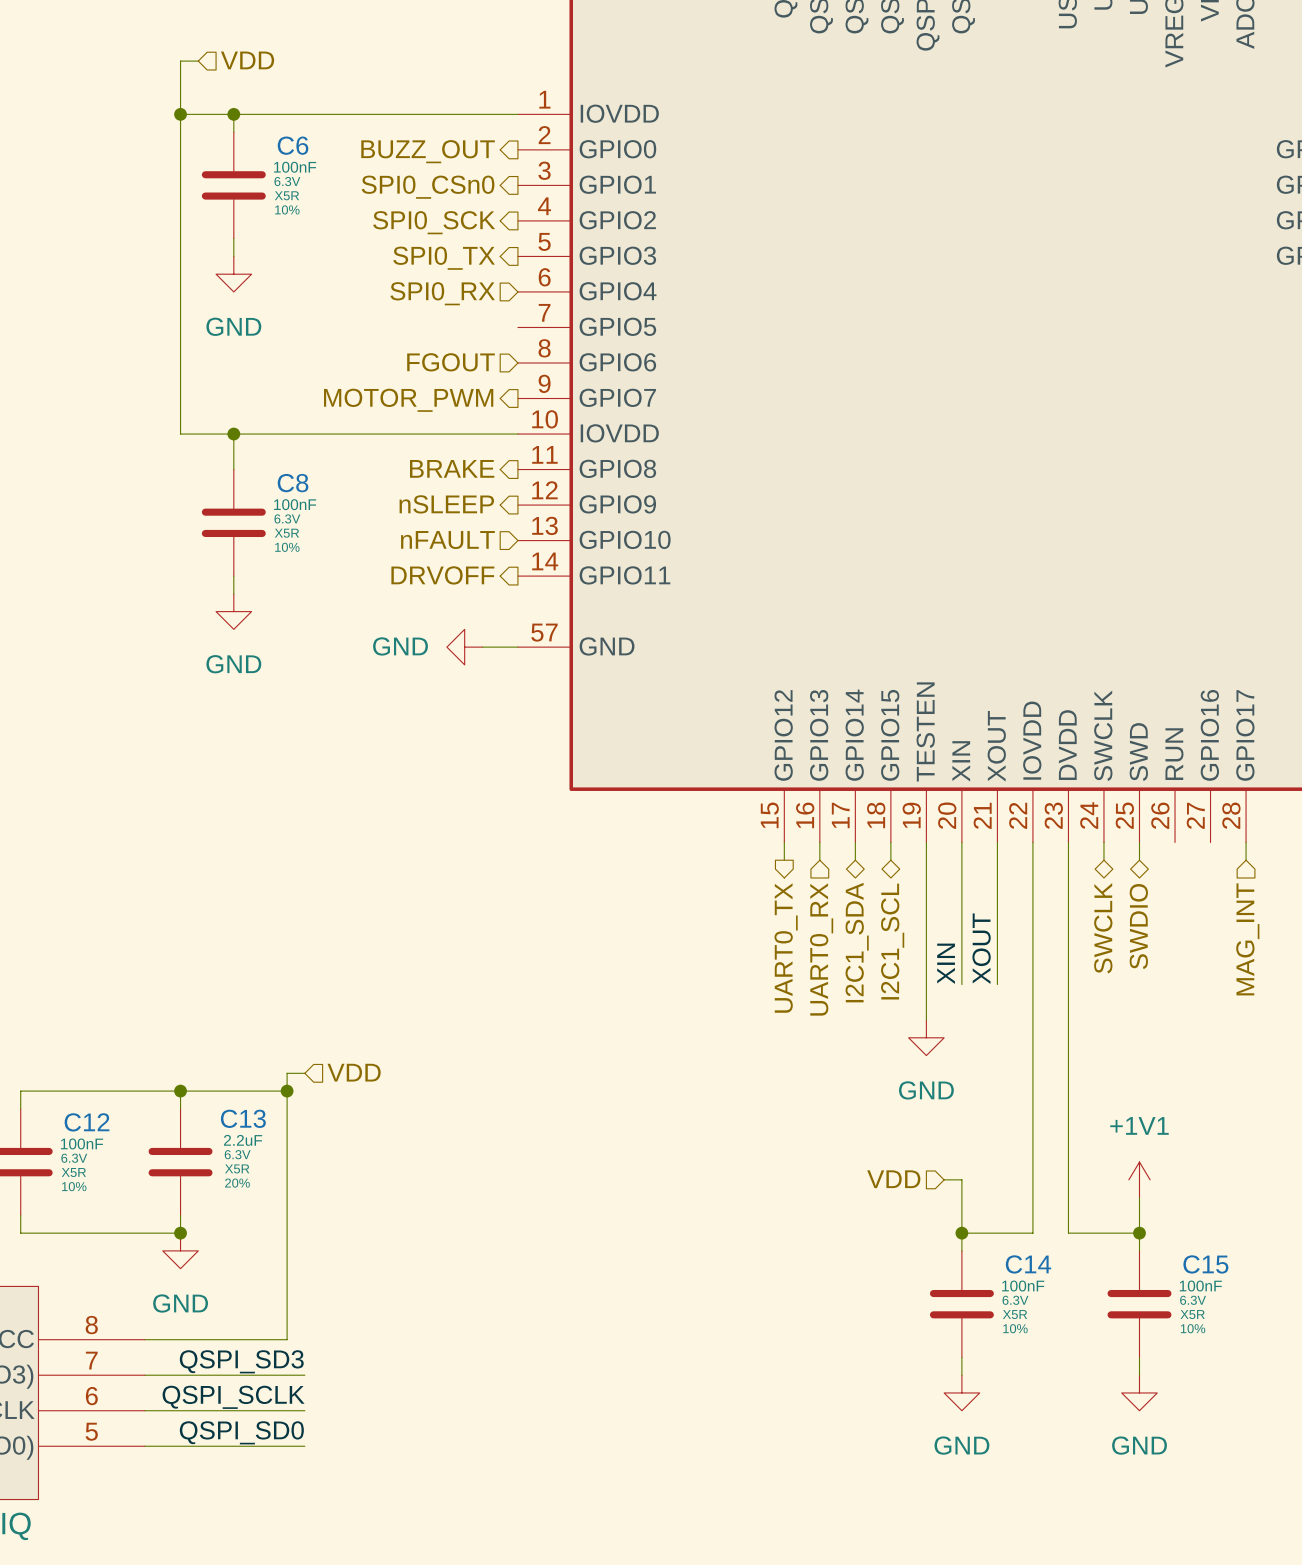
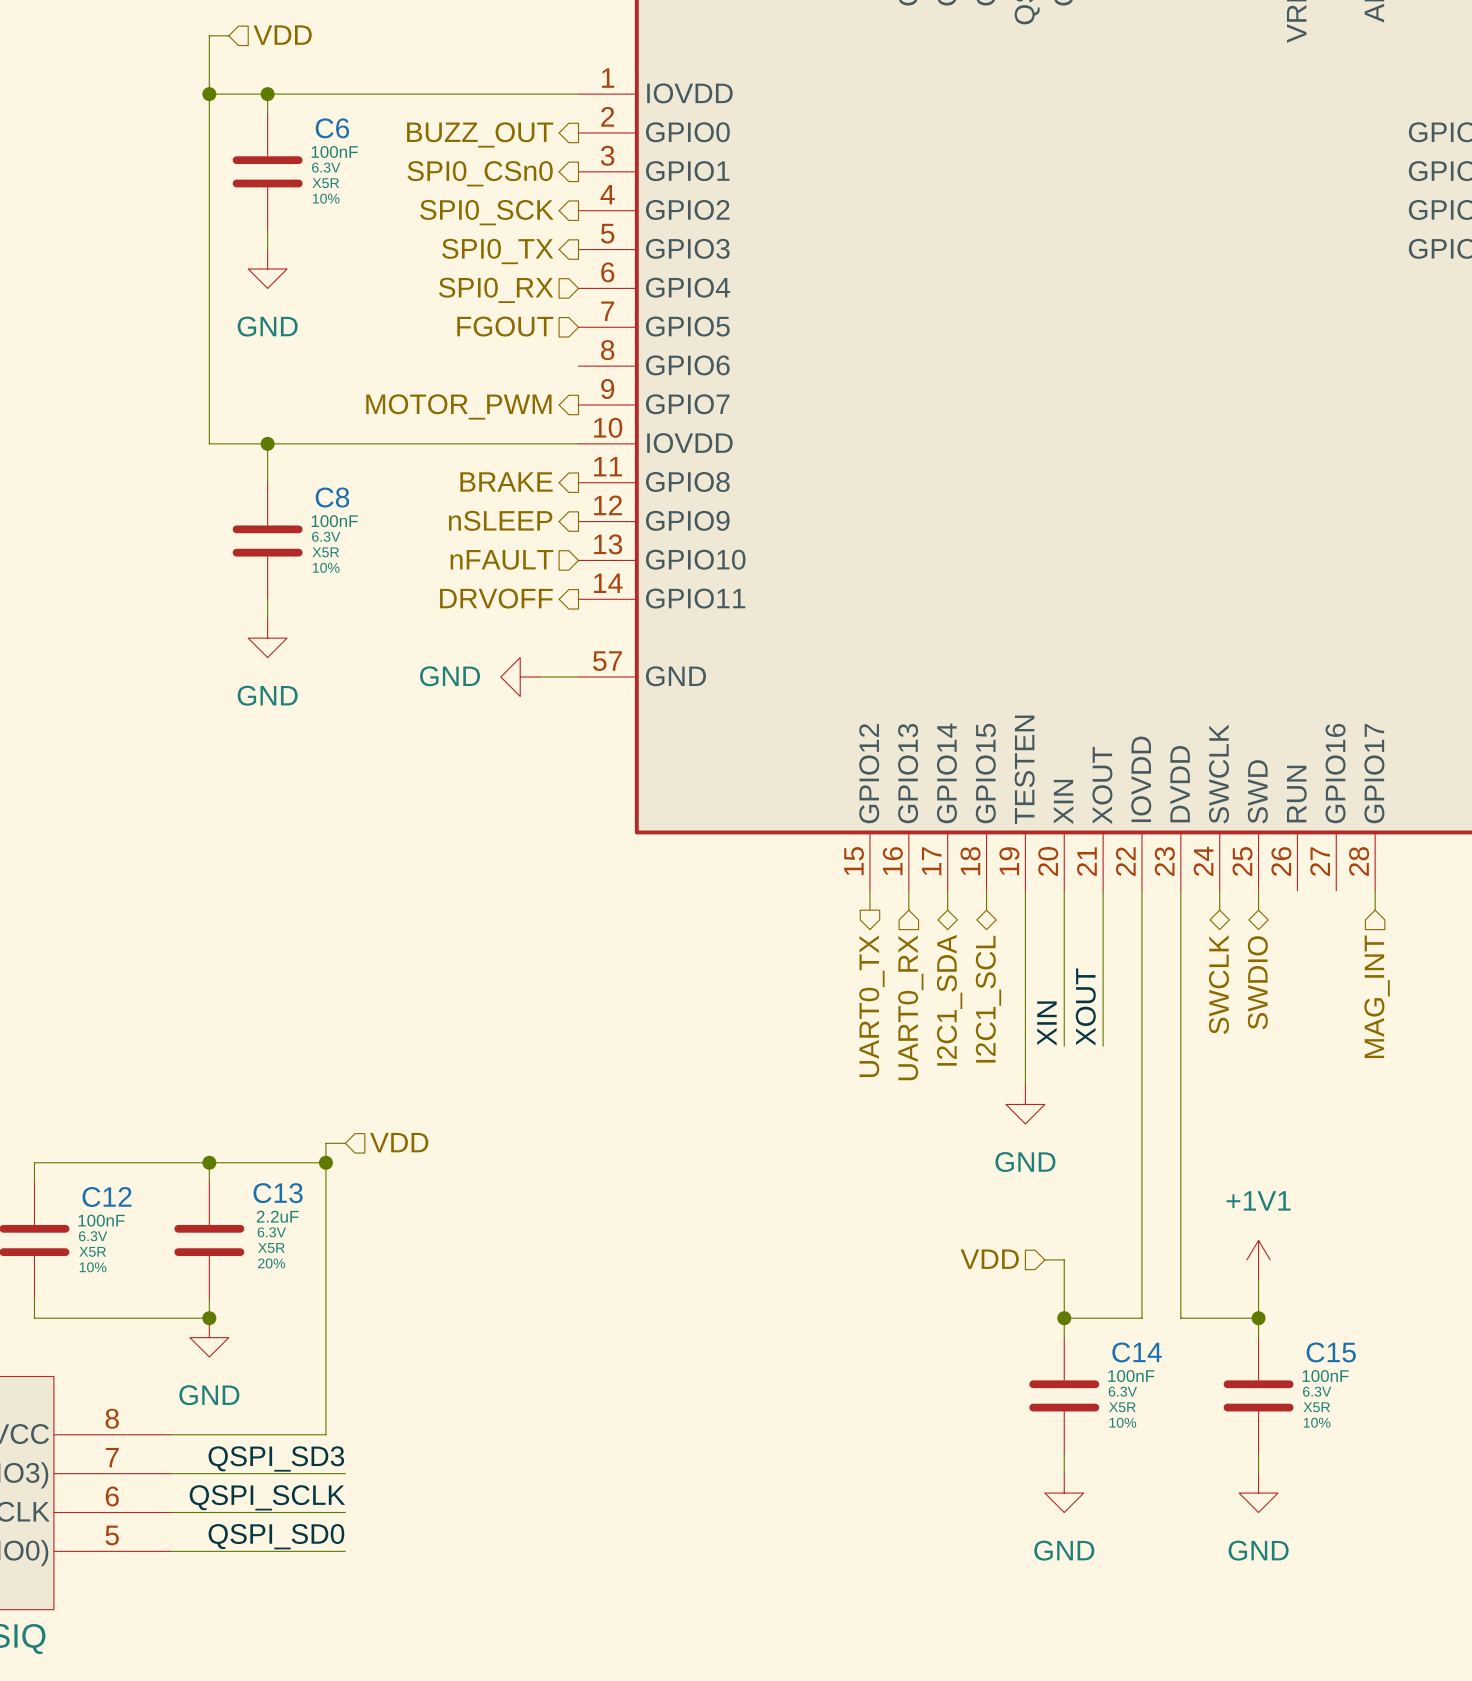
hierarchical label position: FGOUT (450, 362) -> FGOUT (505, 326)

